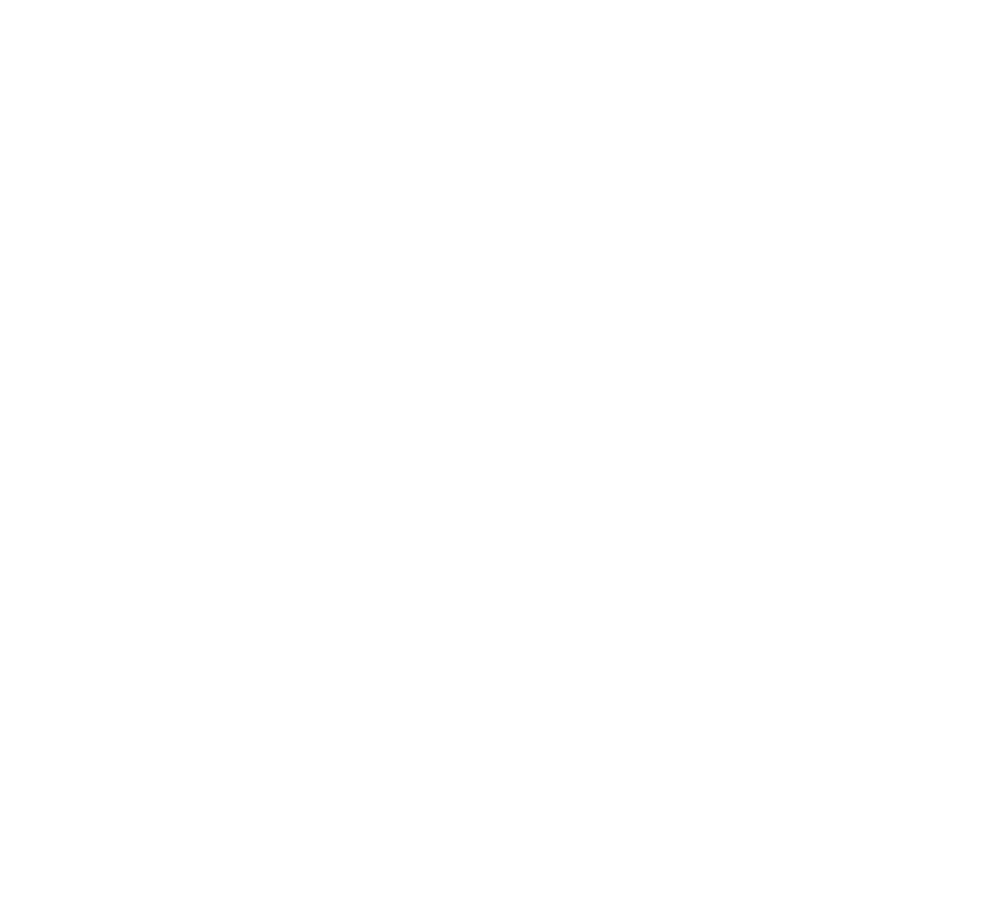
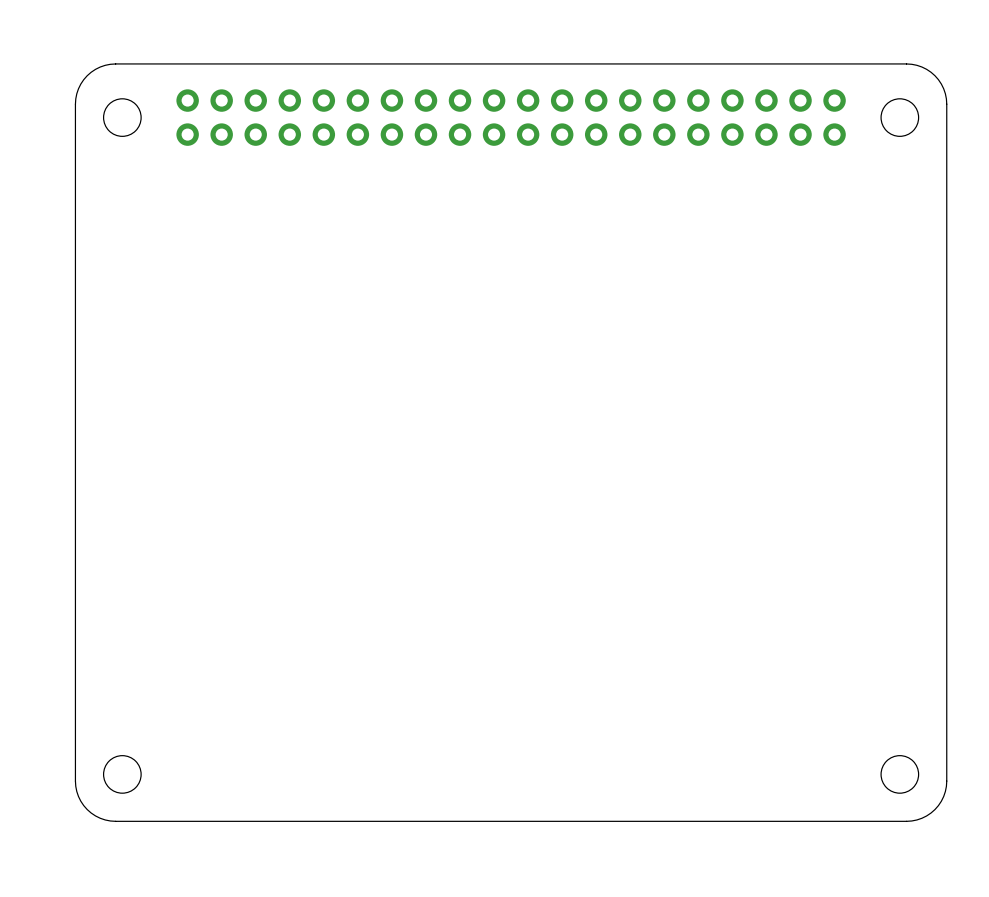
part: none -> (511, 442)

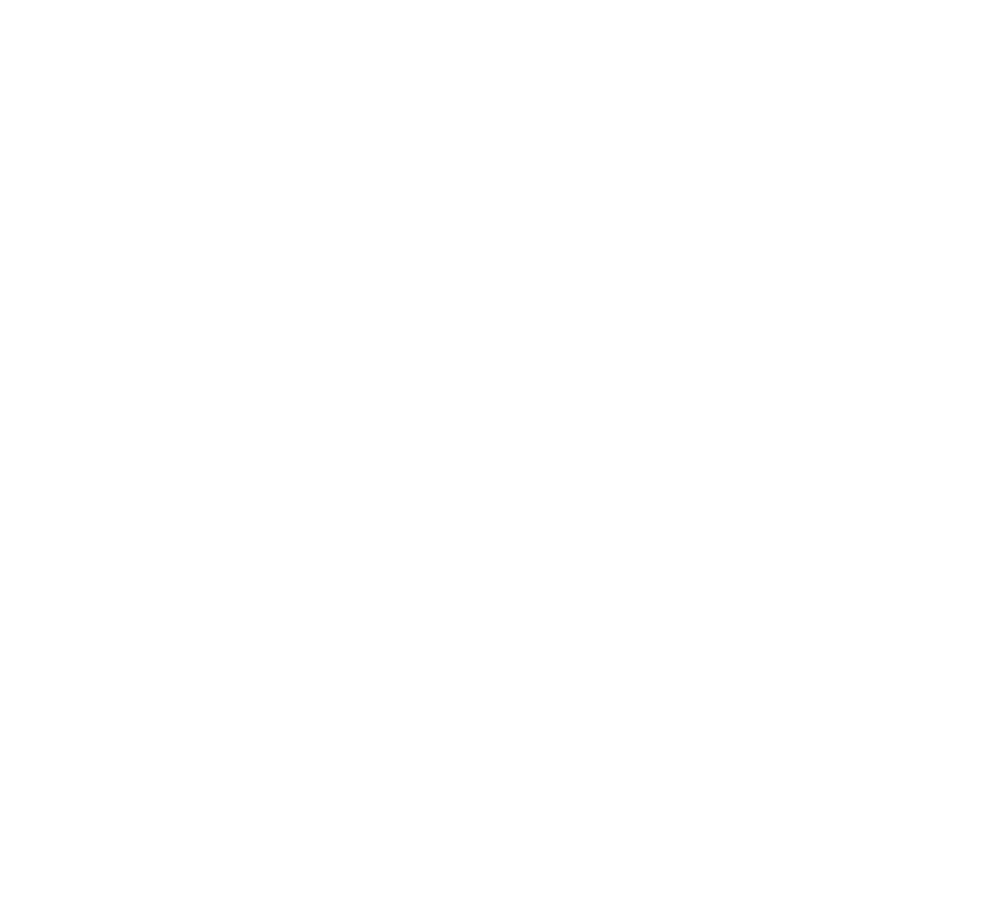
part: (511, 442) -> none

